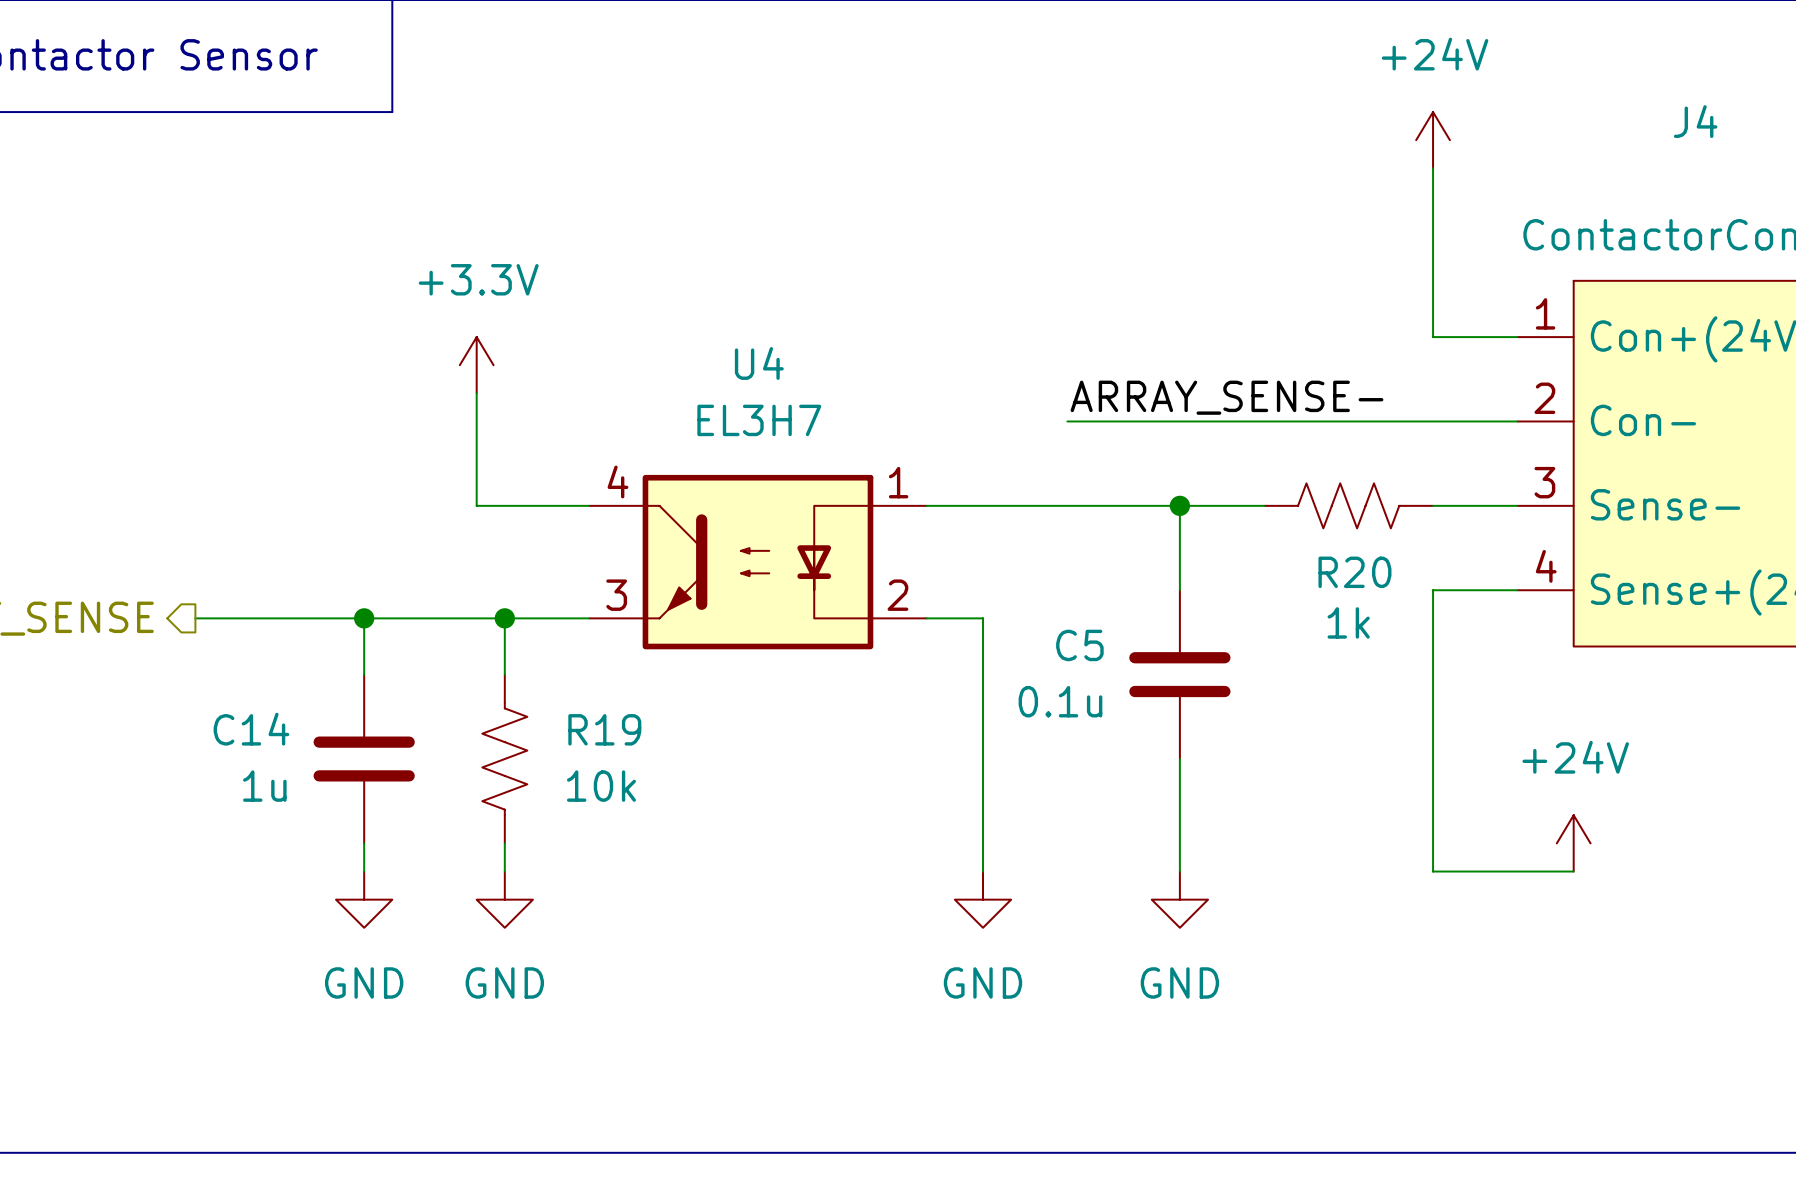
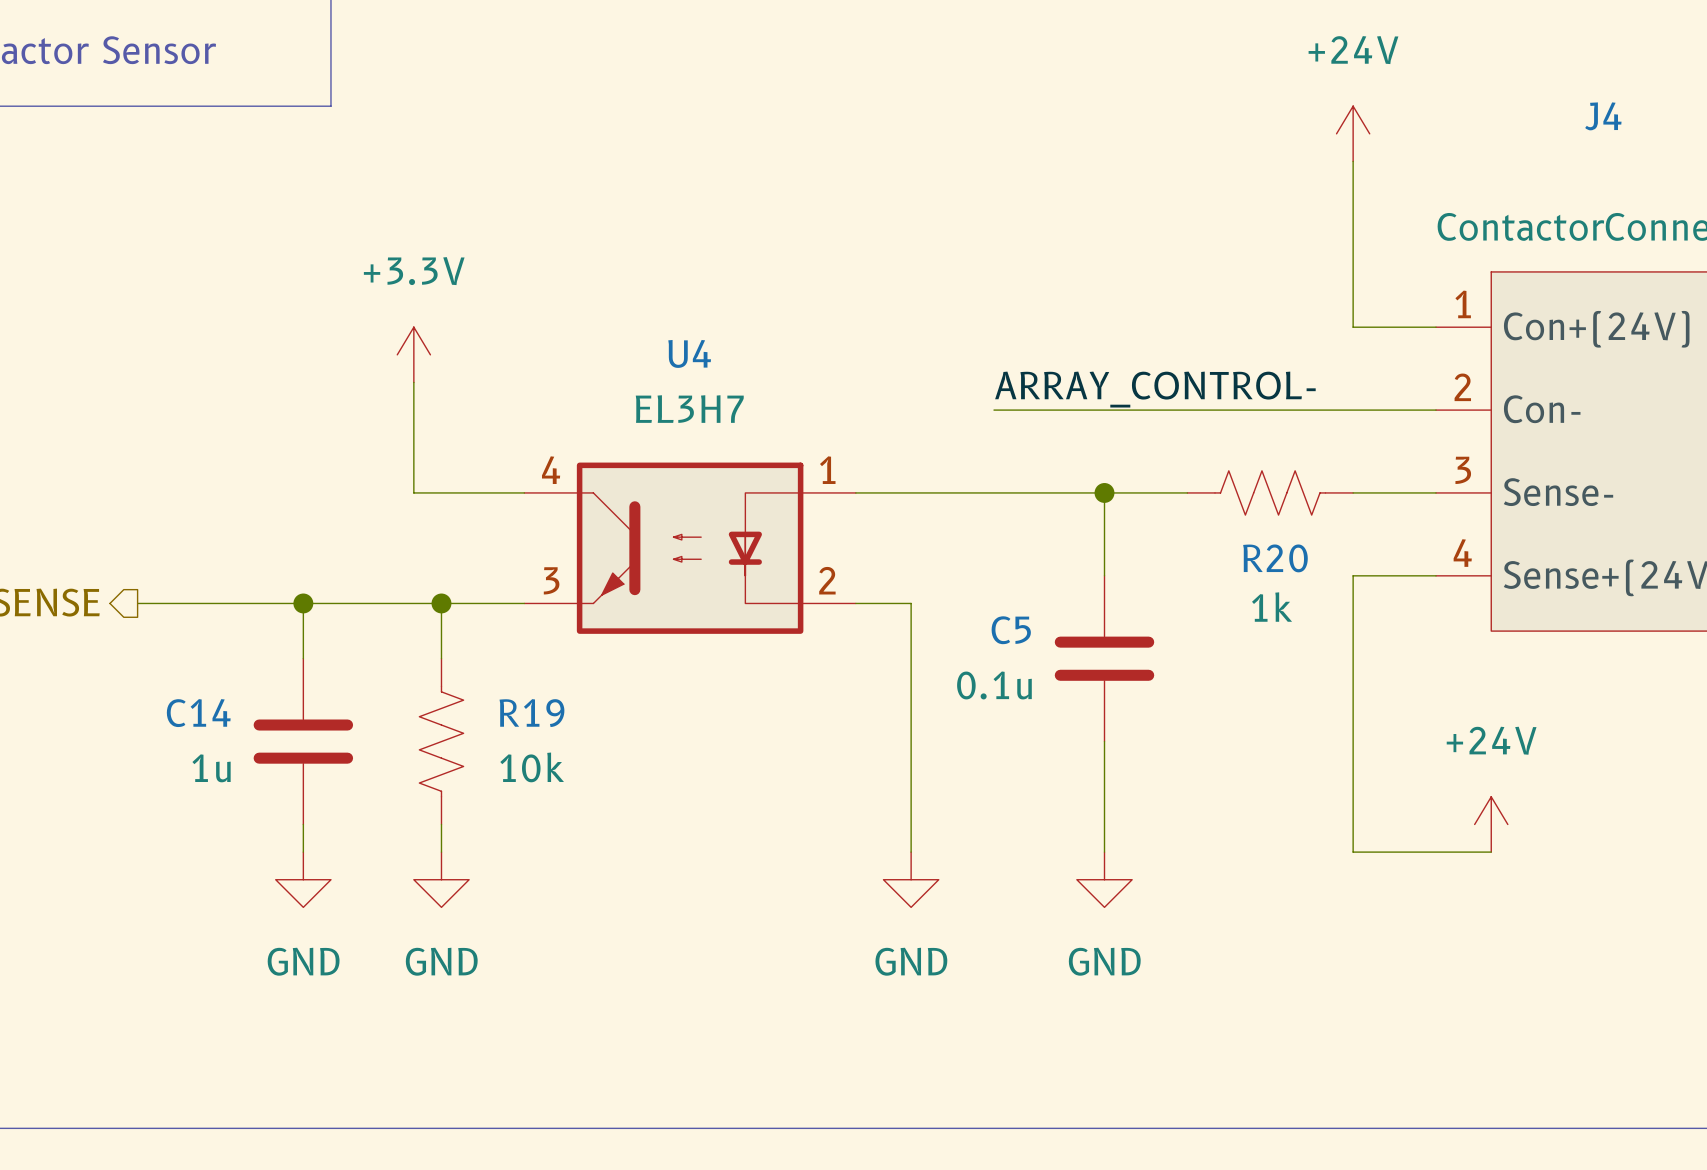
label: ARRAY_SENSE- (1226, 397) -> ARRAY_CONTROL- (1155, 389)

